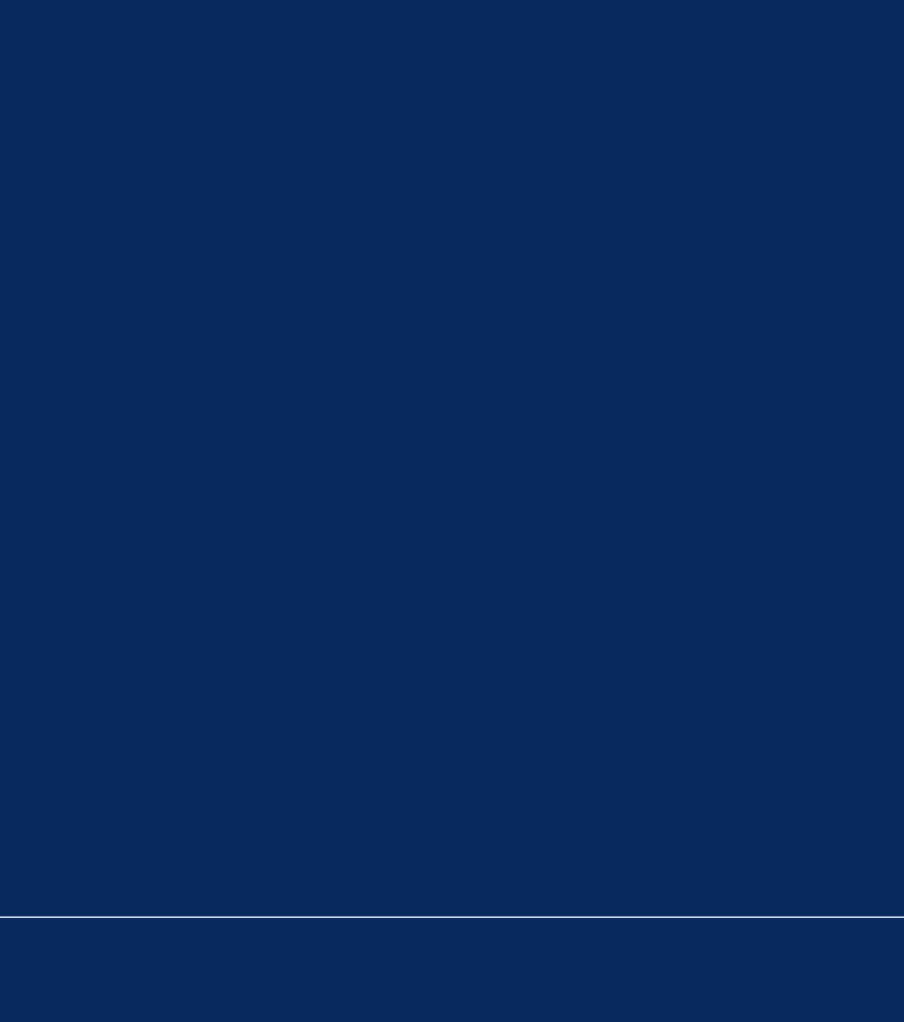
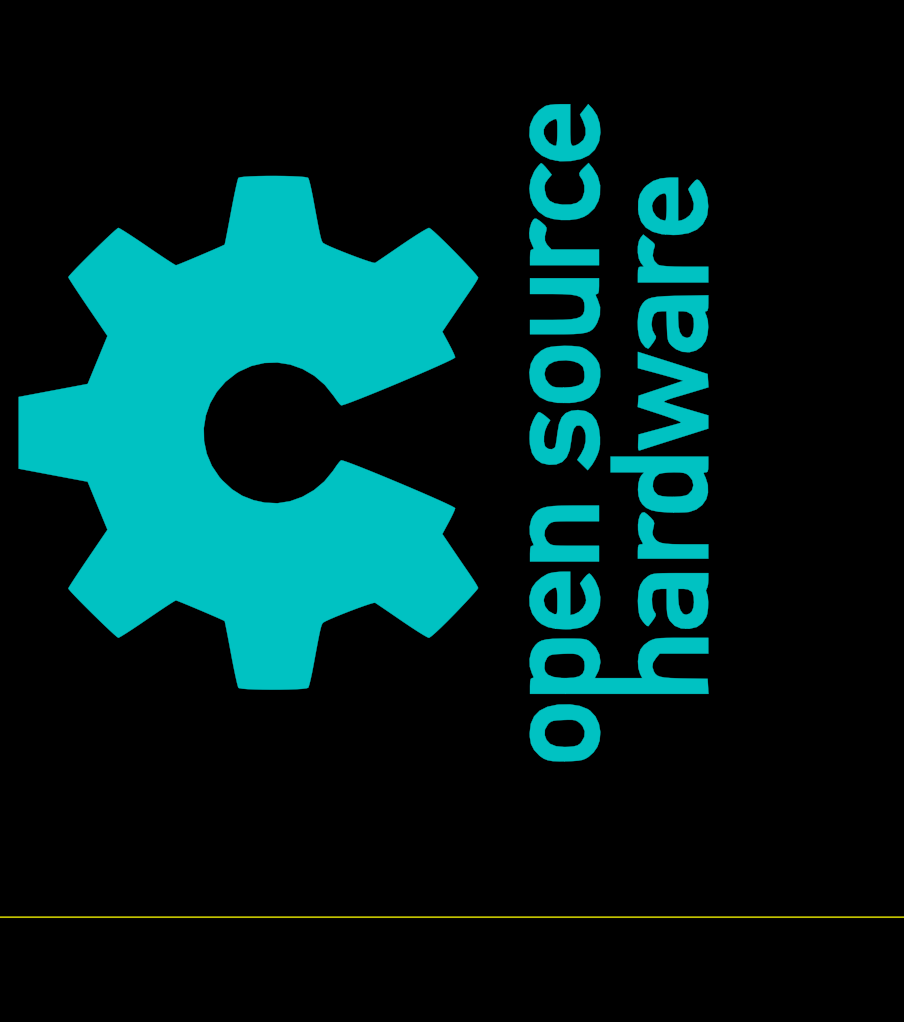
drawing: none -> [18, 103, 709, 762]

